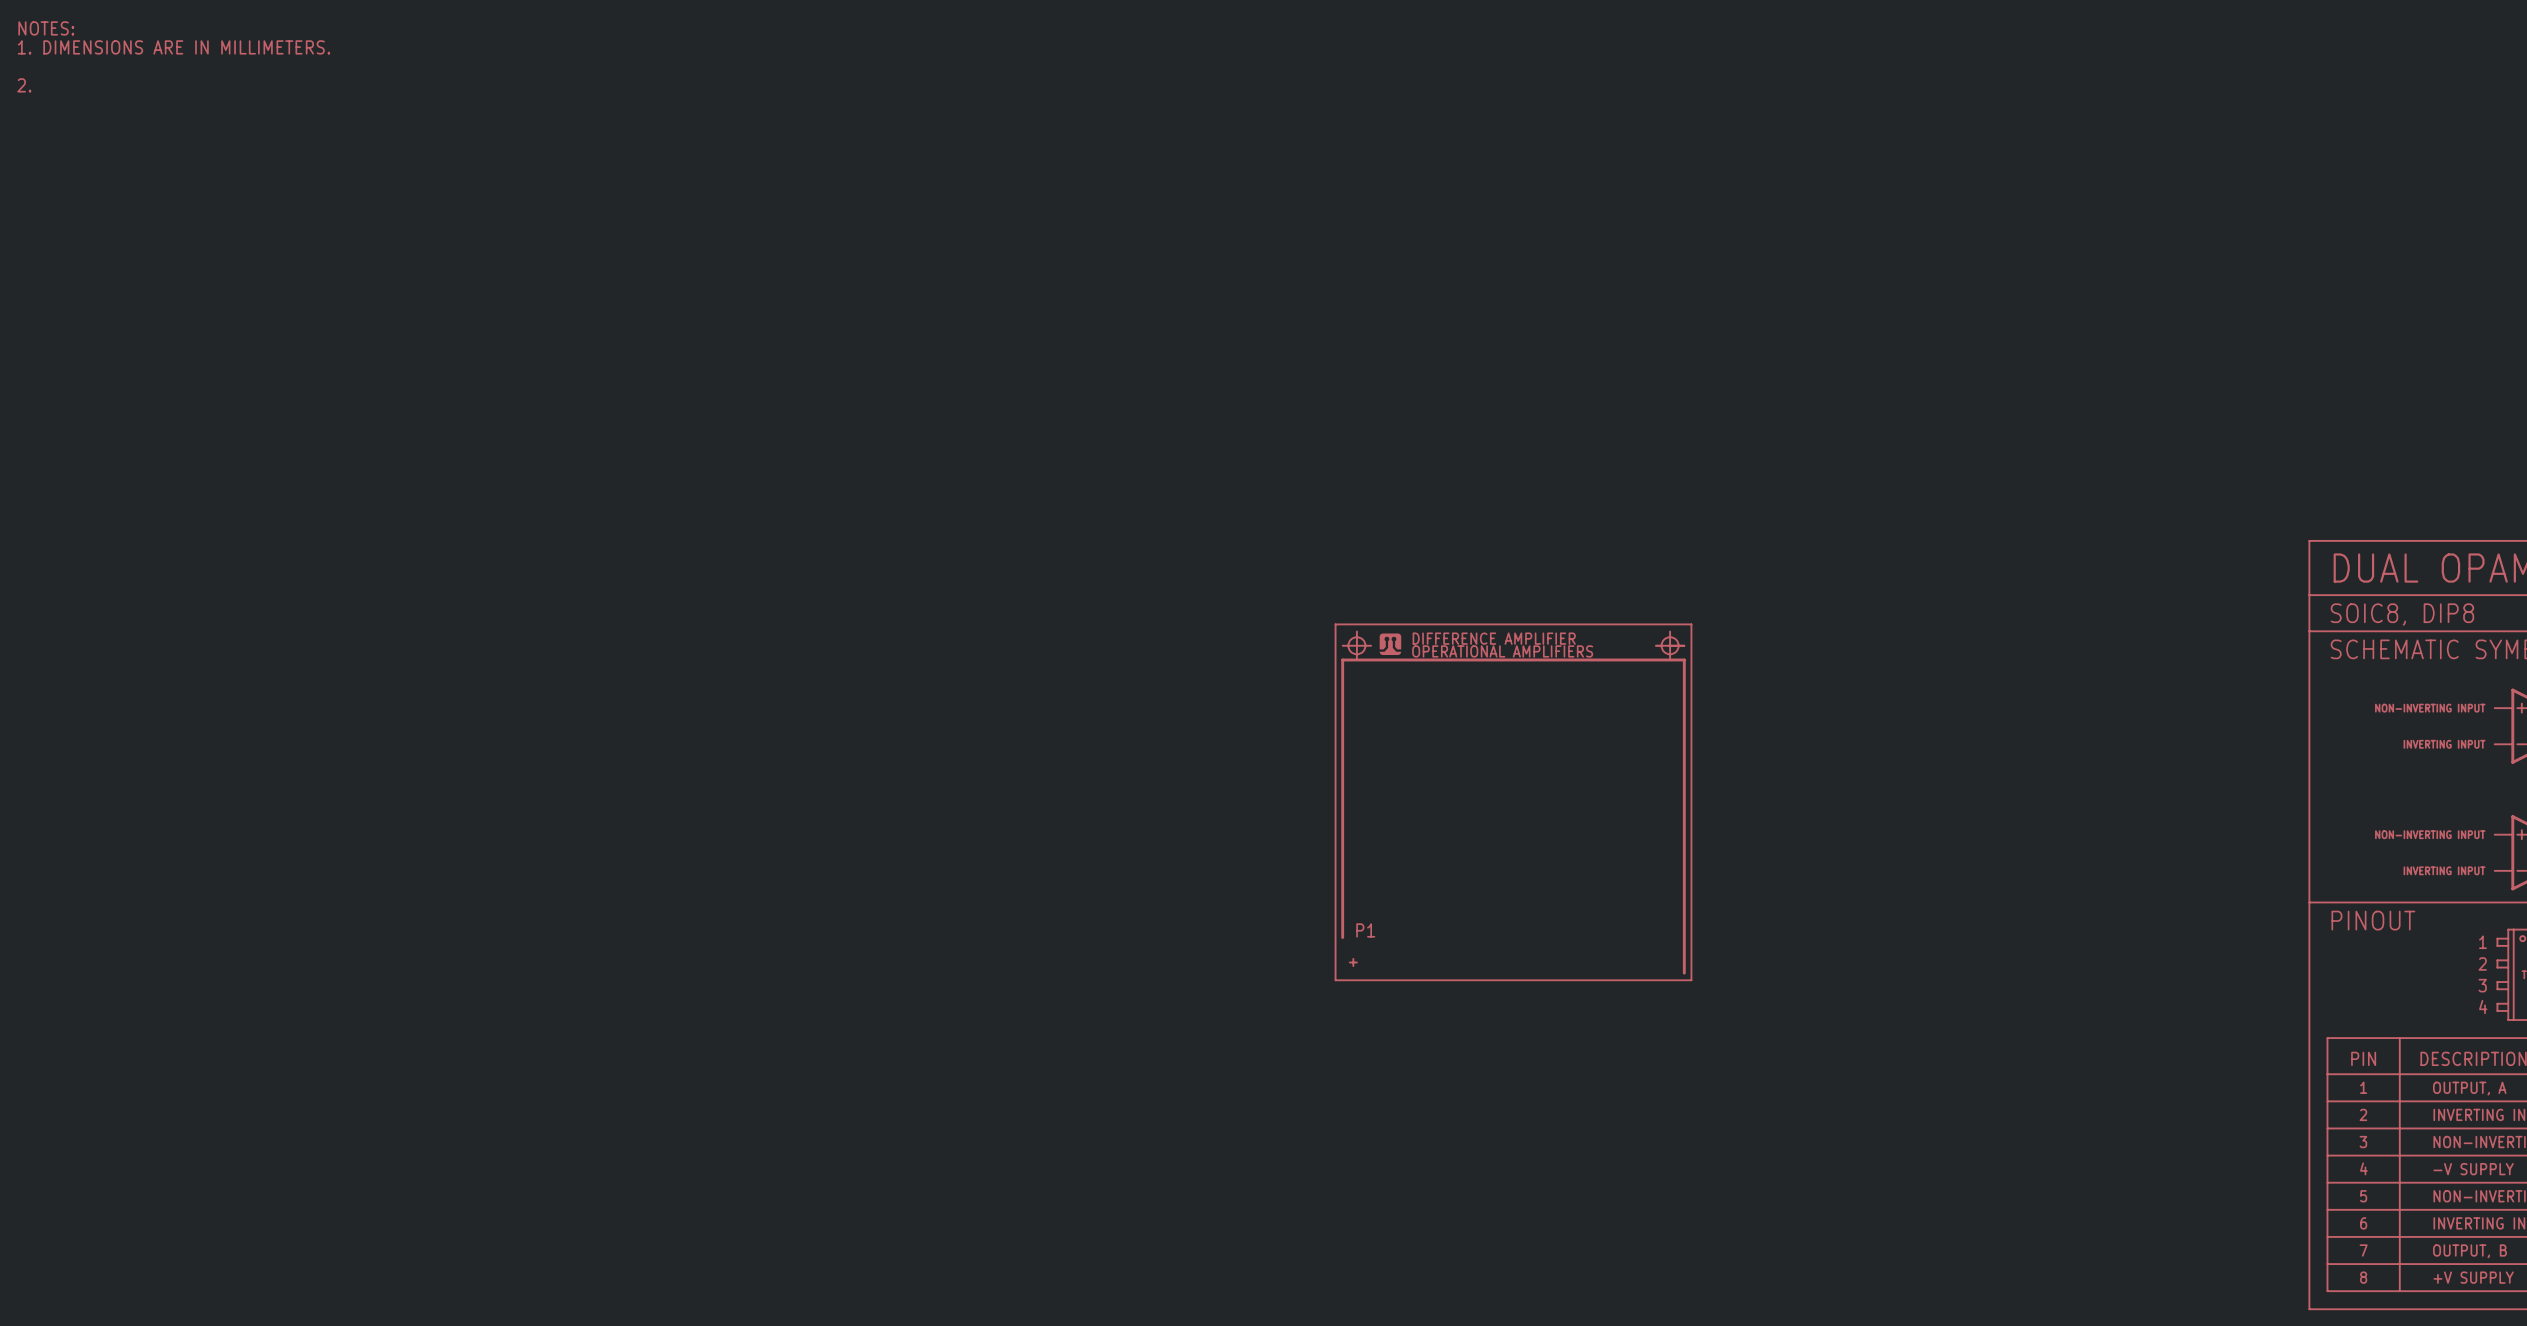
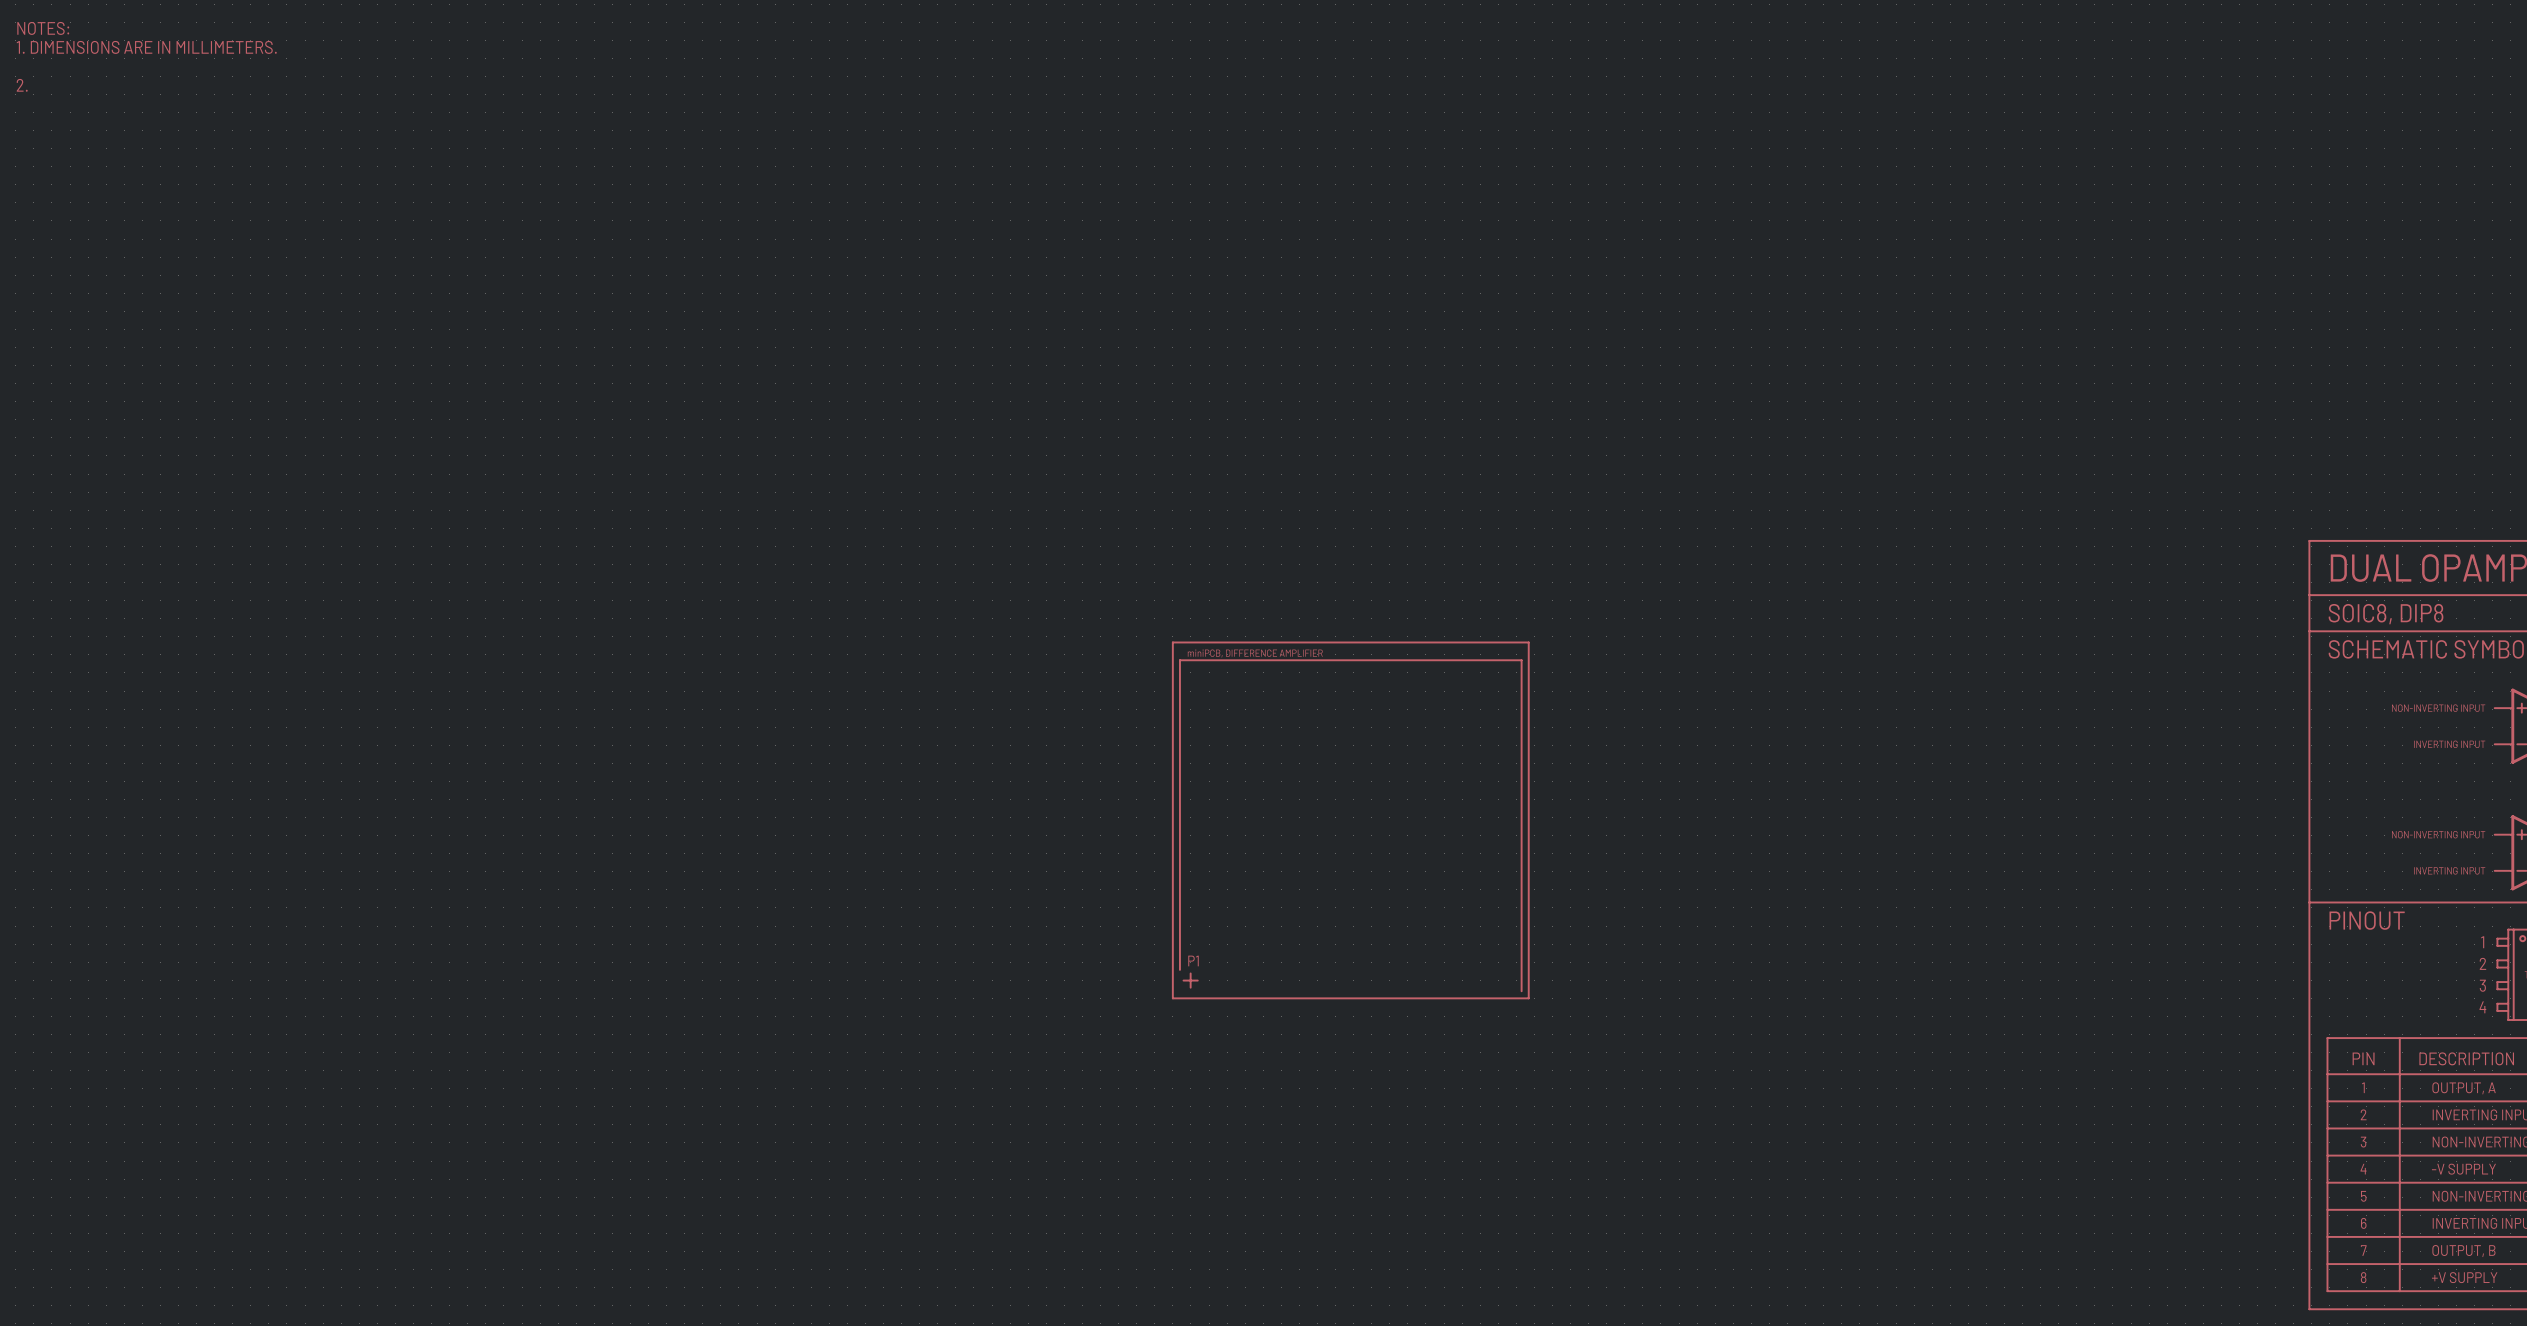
part: (1513, 802) -> none
part: none -> (1350, 820)

